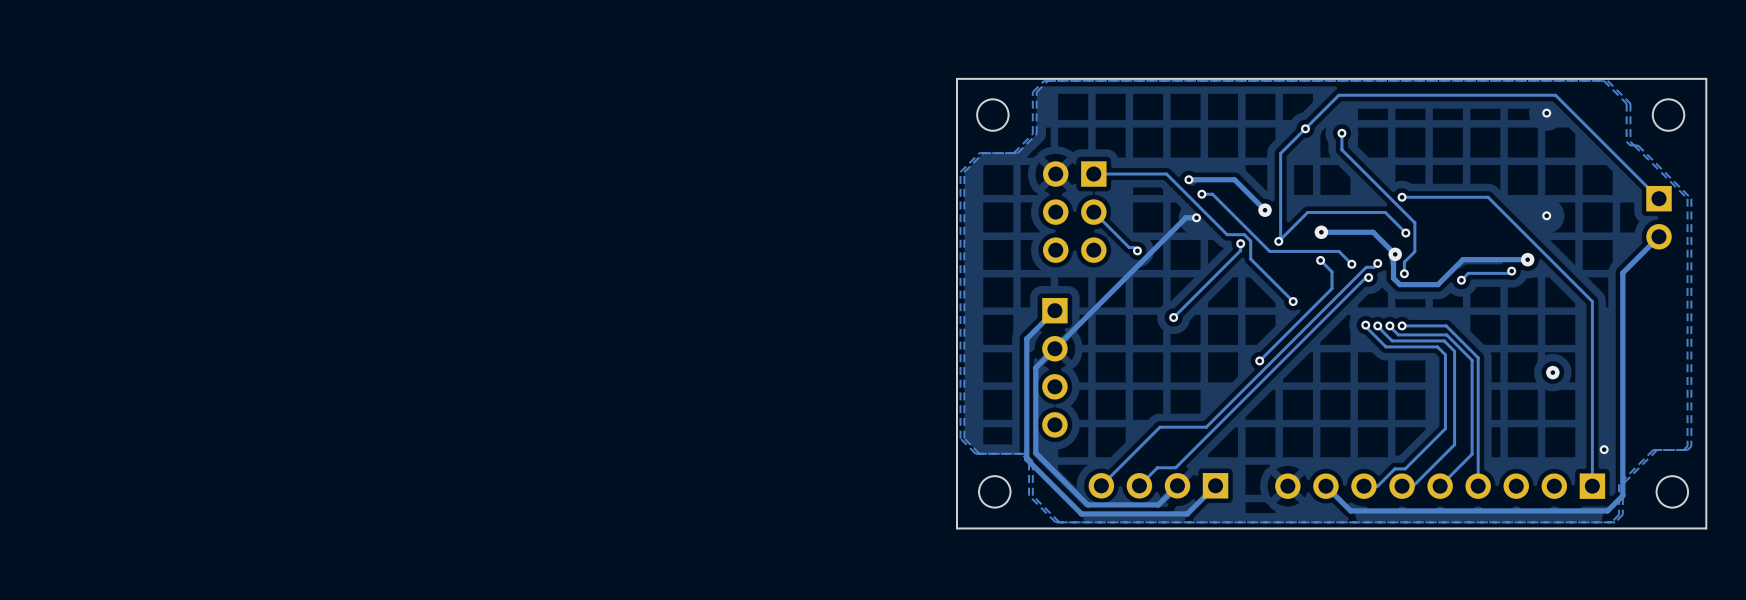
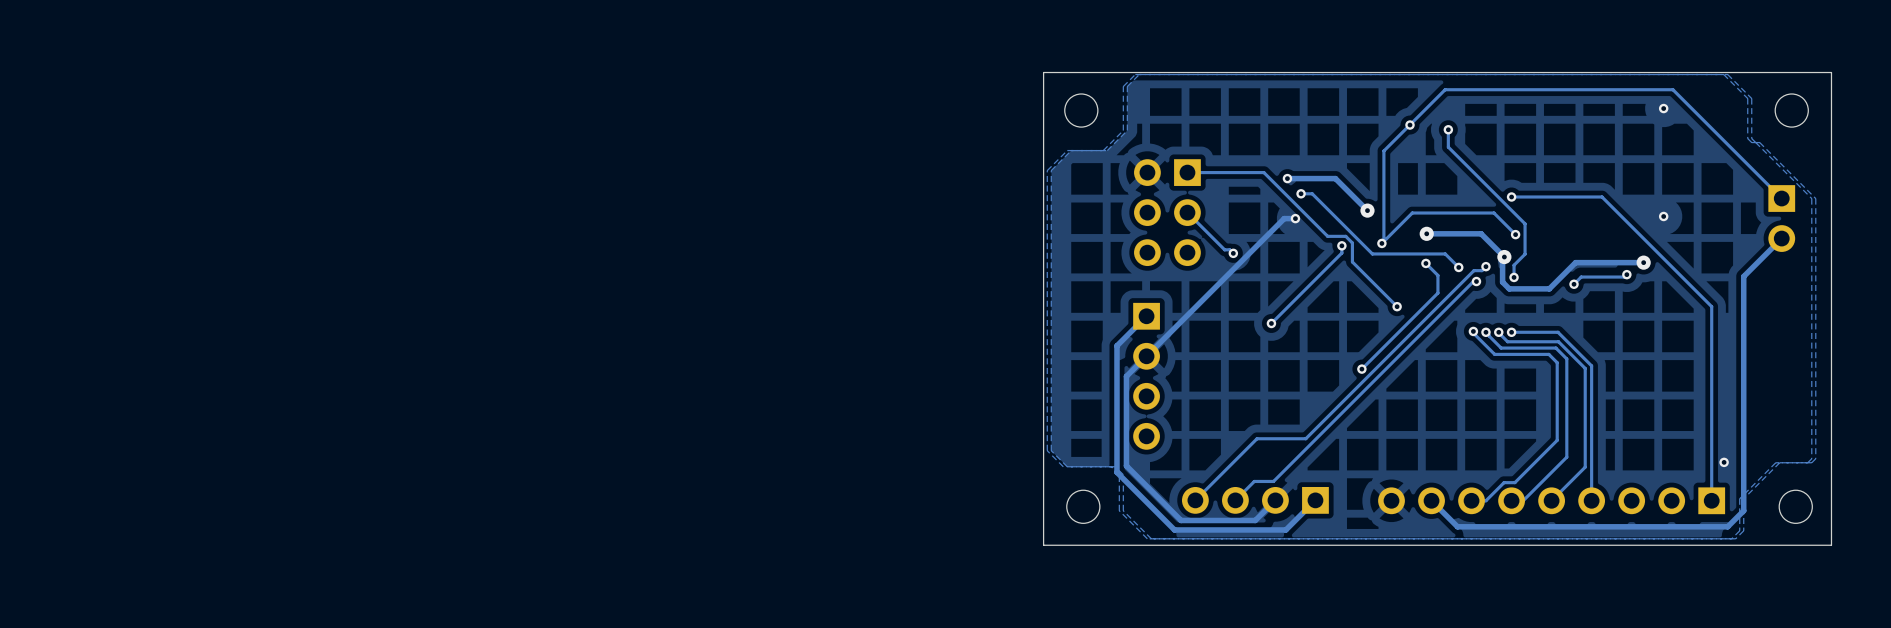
via: (1552, 372) -> none

